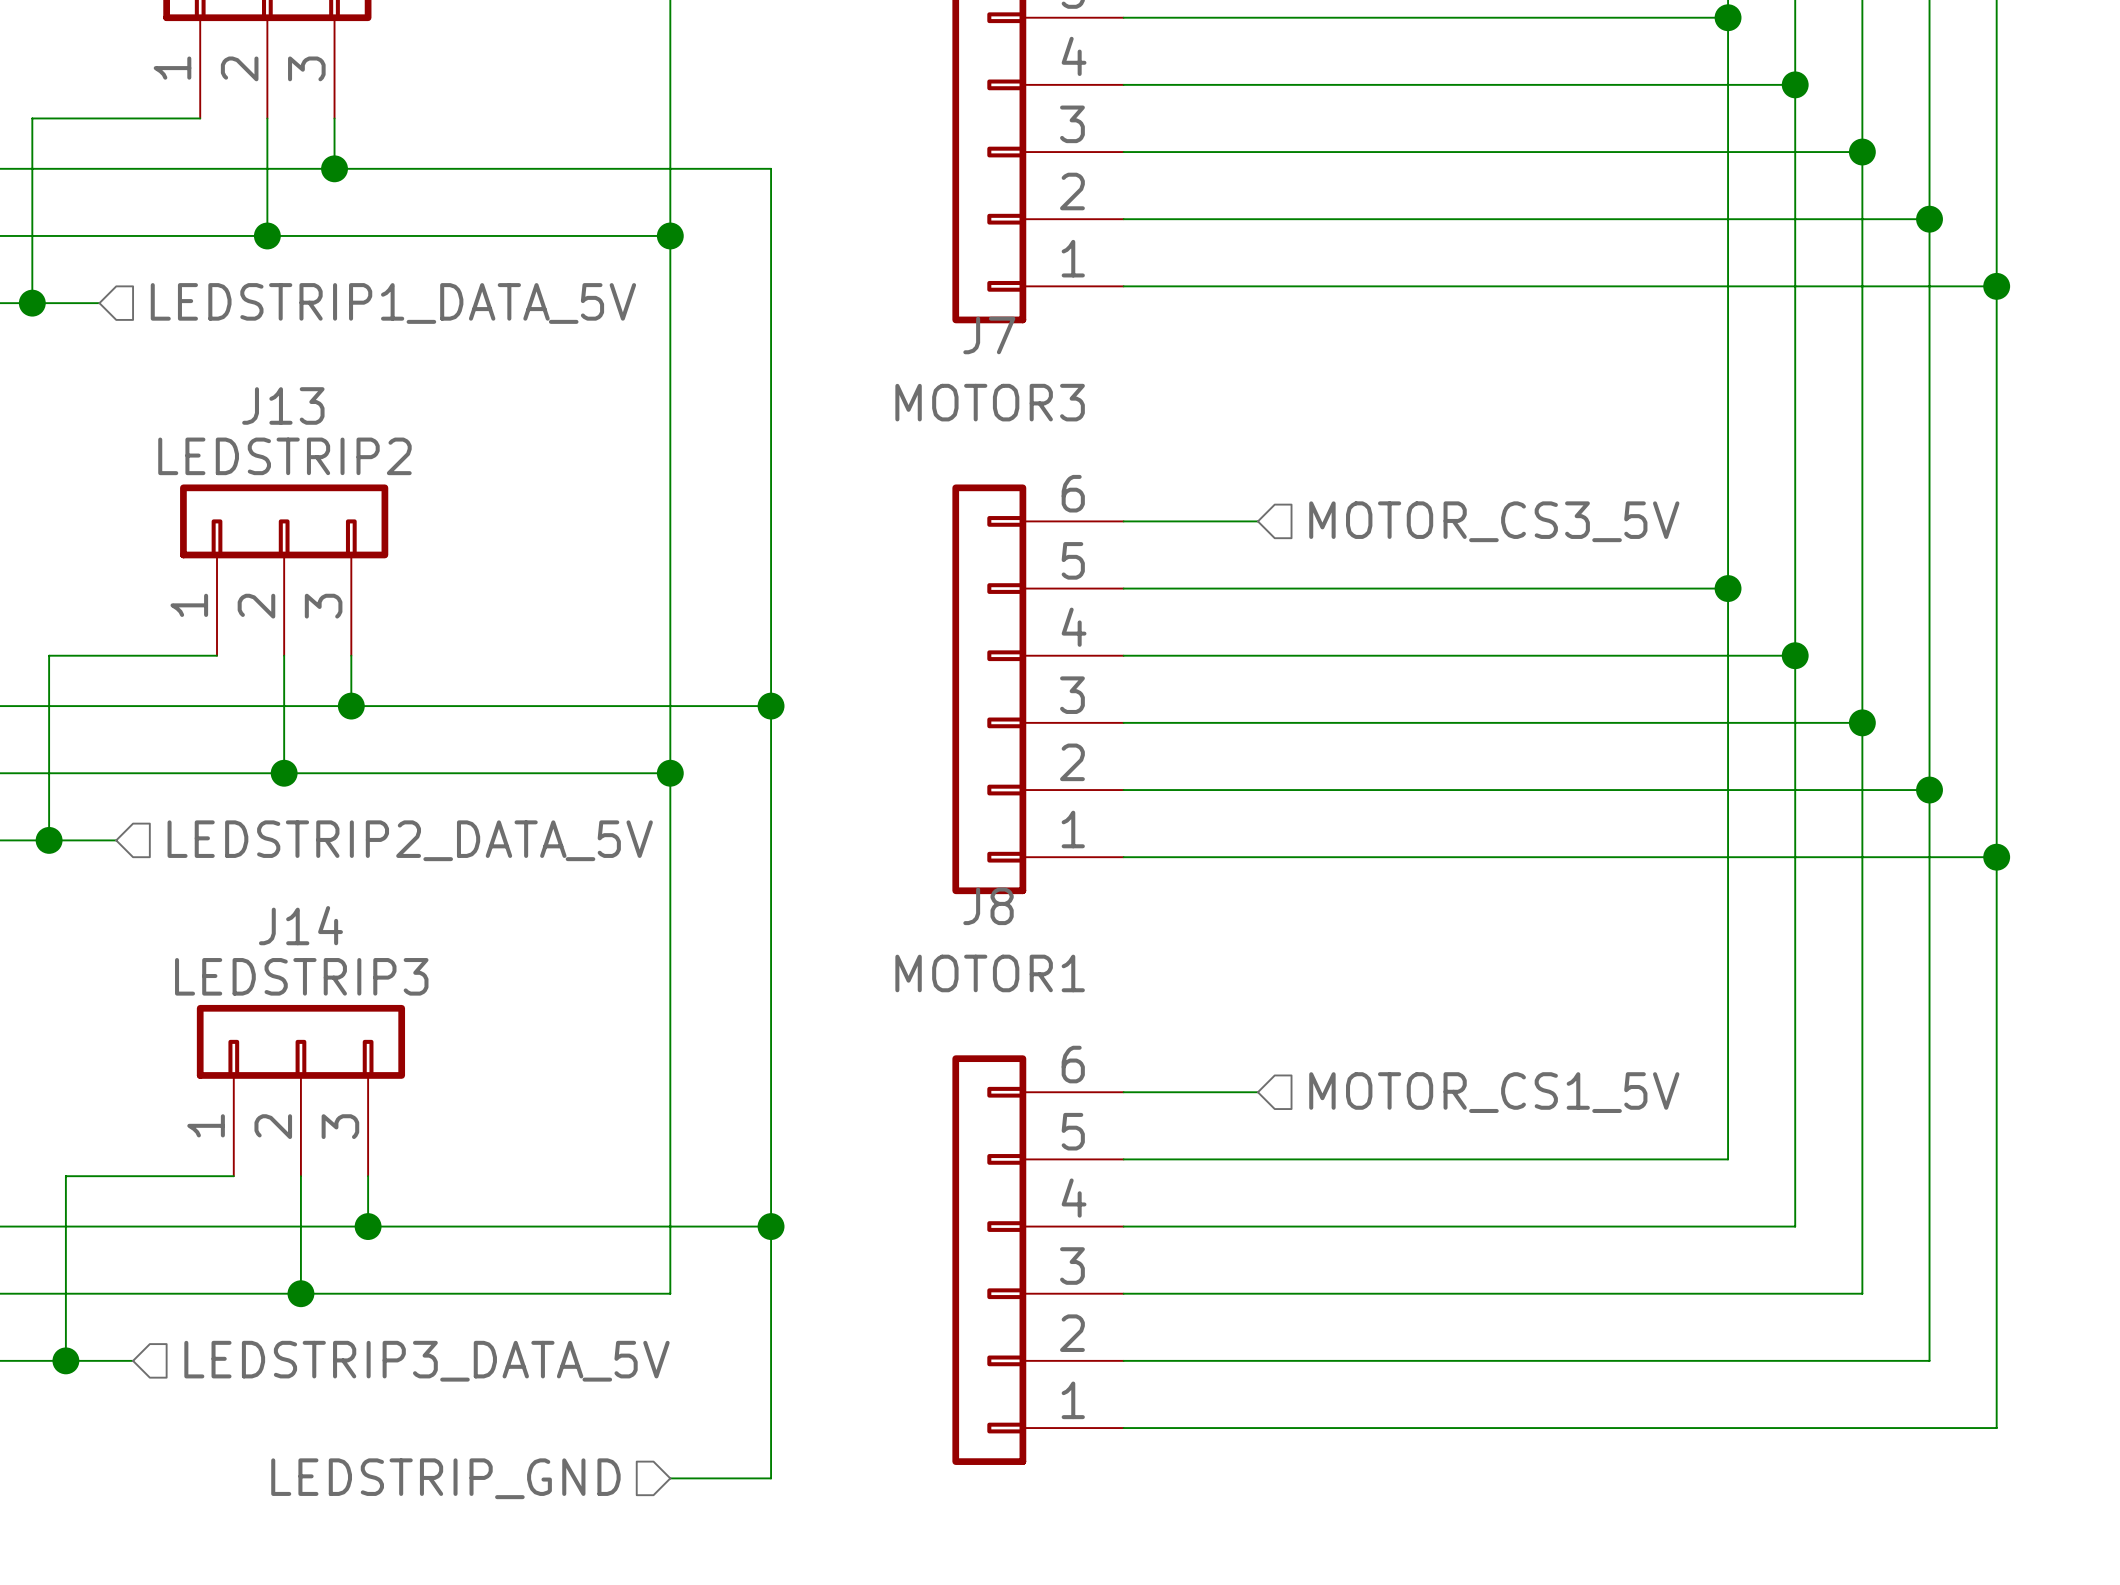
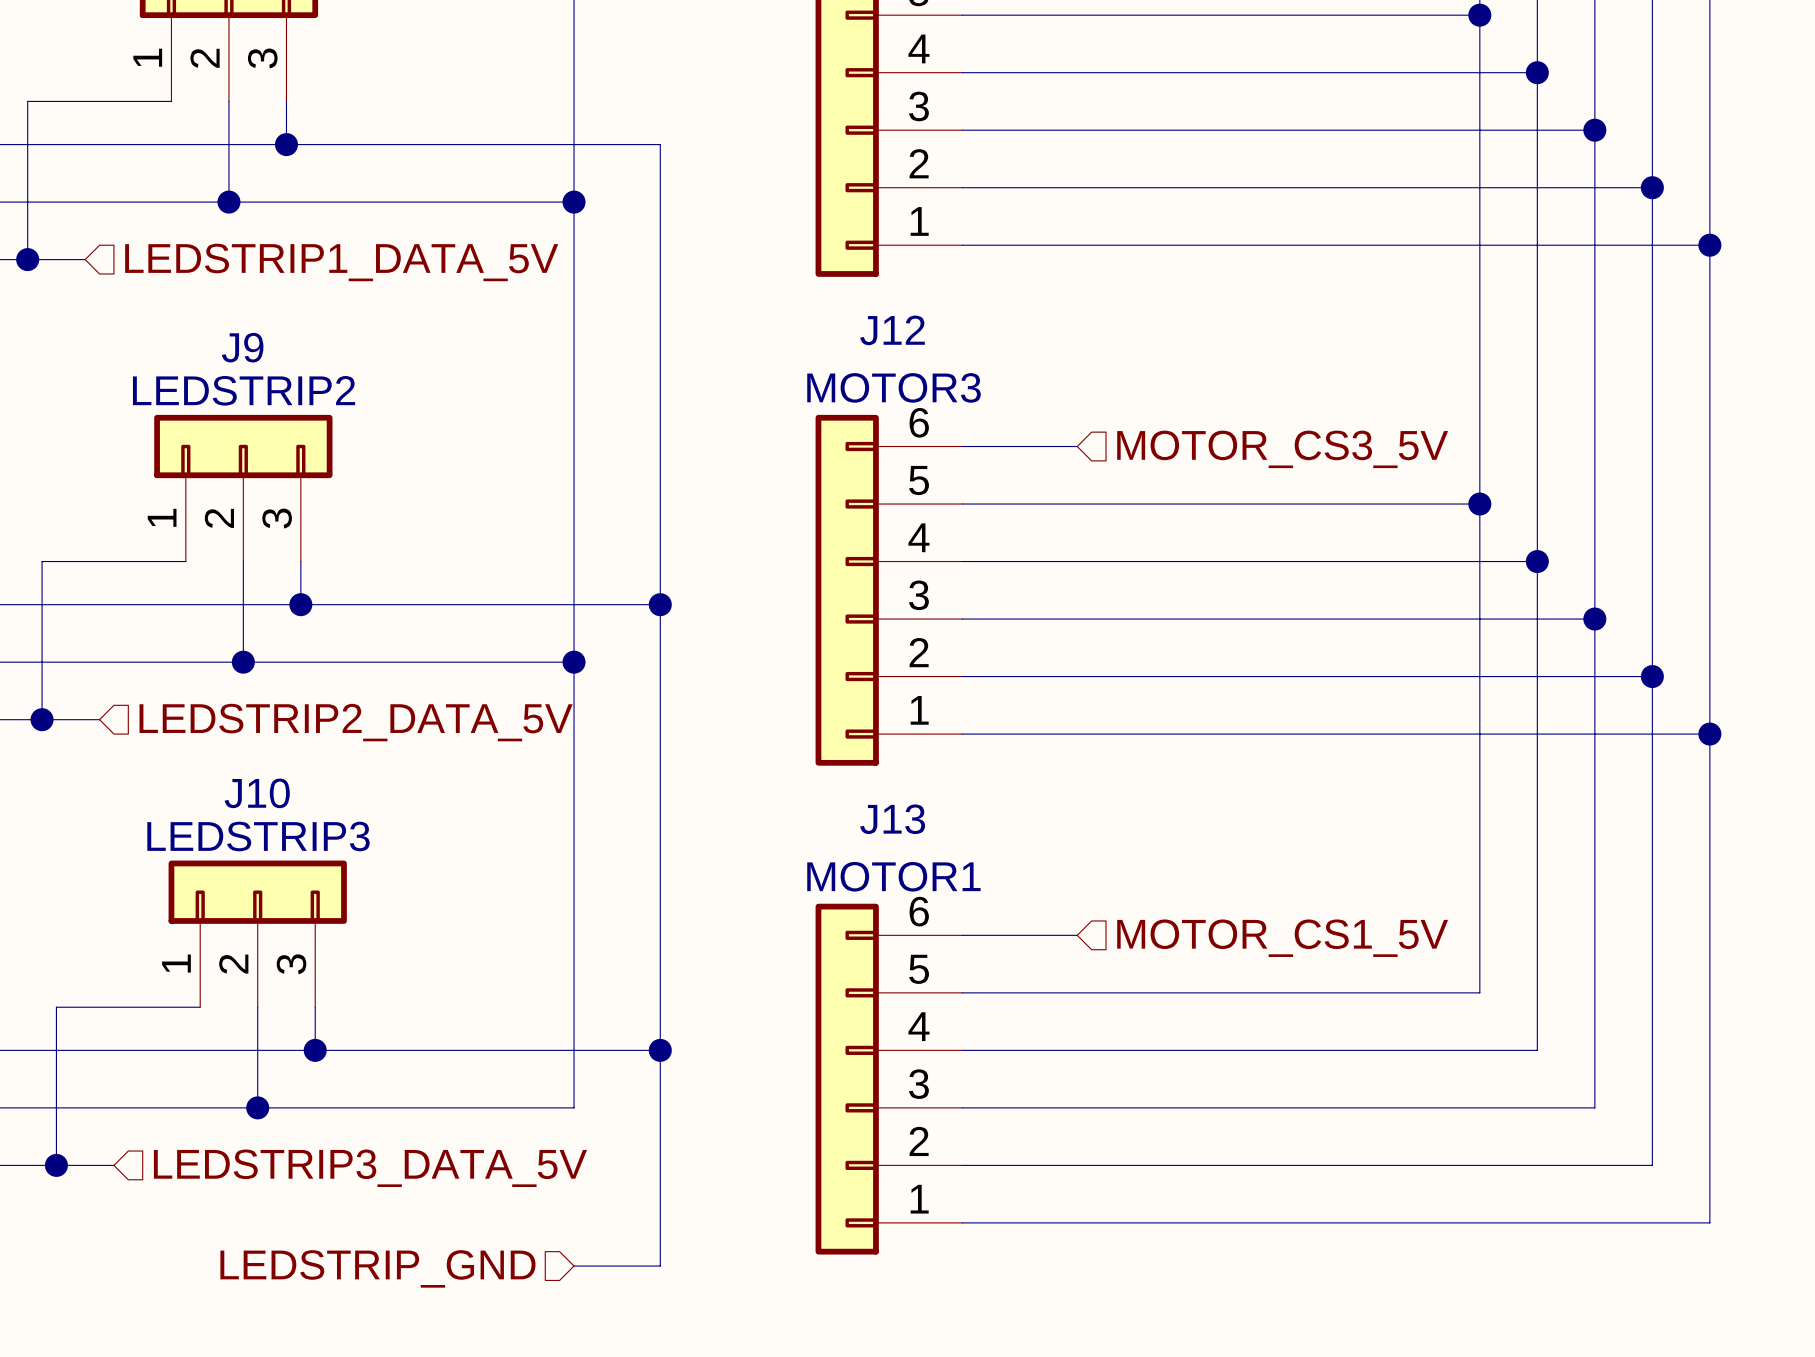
J7 name: J7 (989, 335) -> J12 (892, 330)
J7 value position: MOTOR3 (990, 402) -> MOTOR3 (894, 387)
J13 name: J13 (283, 405) -> J9 (242, 347)
J8 name: J8 (988, 906) -> J13 (892, 819)
J14 name: J14 (300, 925) -> J10 (257, 793)
J8 value position: MOTOR1 (990, 973) -> MOTOR1 (893, 876)

